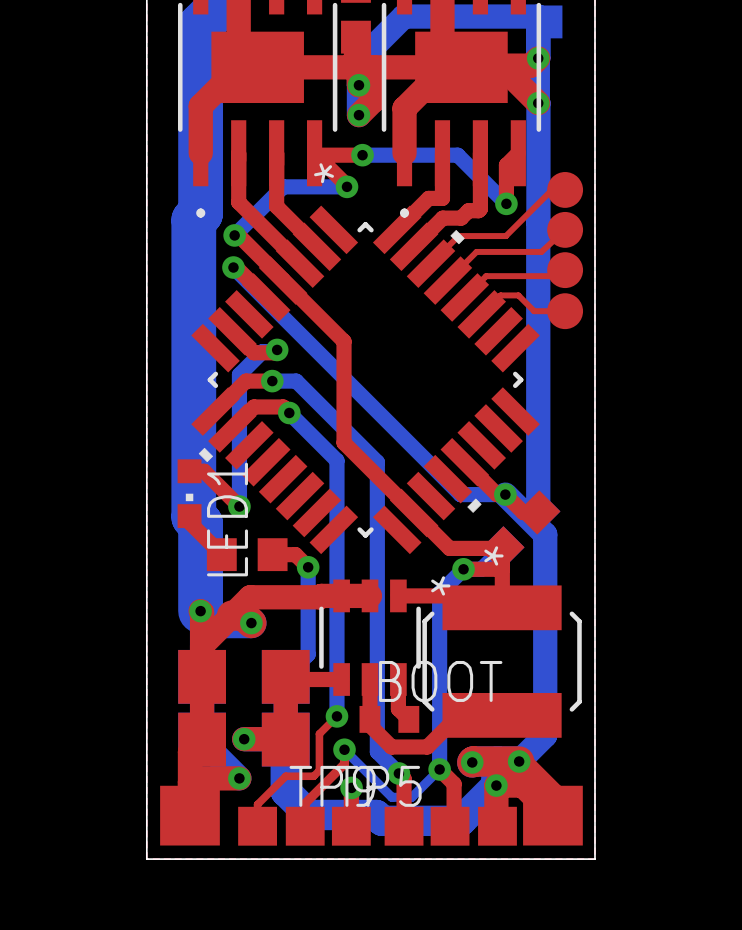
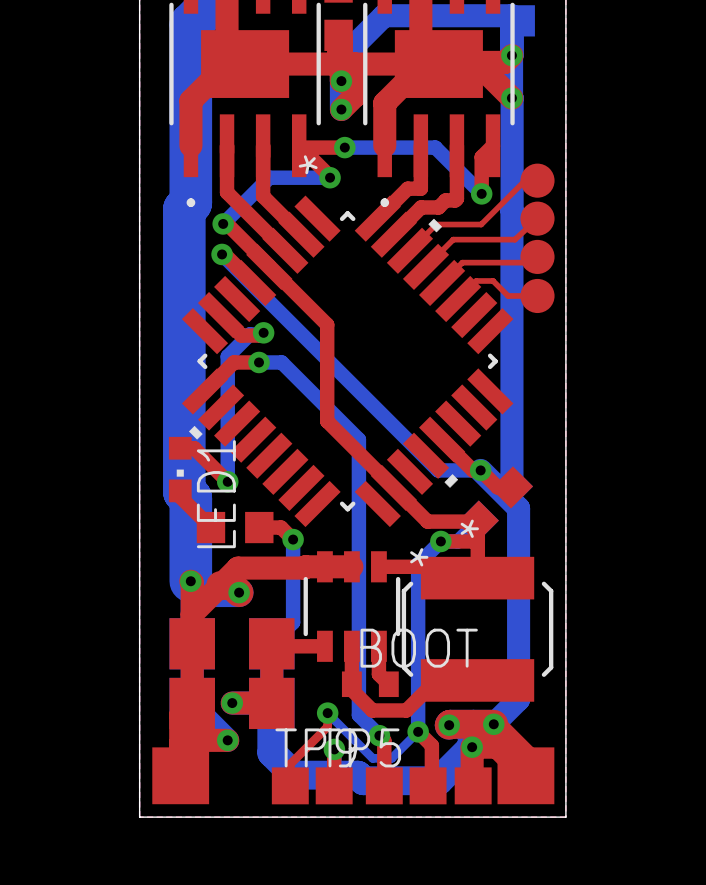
top track: (289, 412) (283, 406) (253, 406) (232, 428) -> none
bottom track: (289, 412) (336, 460) (336, 716) -> none
via: (289, 412) -> none
top track: (336, 716) (319, 733) (319, 770) (313, 776) (285, 776) (257, 804) (257, 826) -> none
via: (336, 716) -> none
part: (257, 826) -> none

